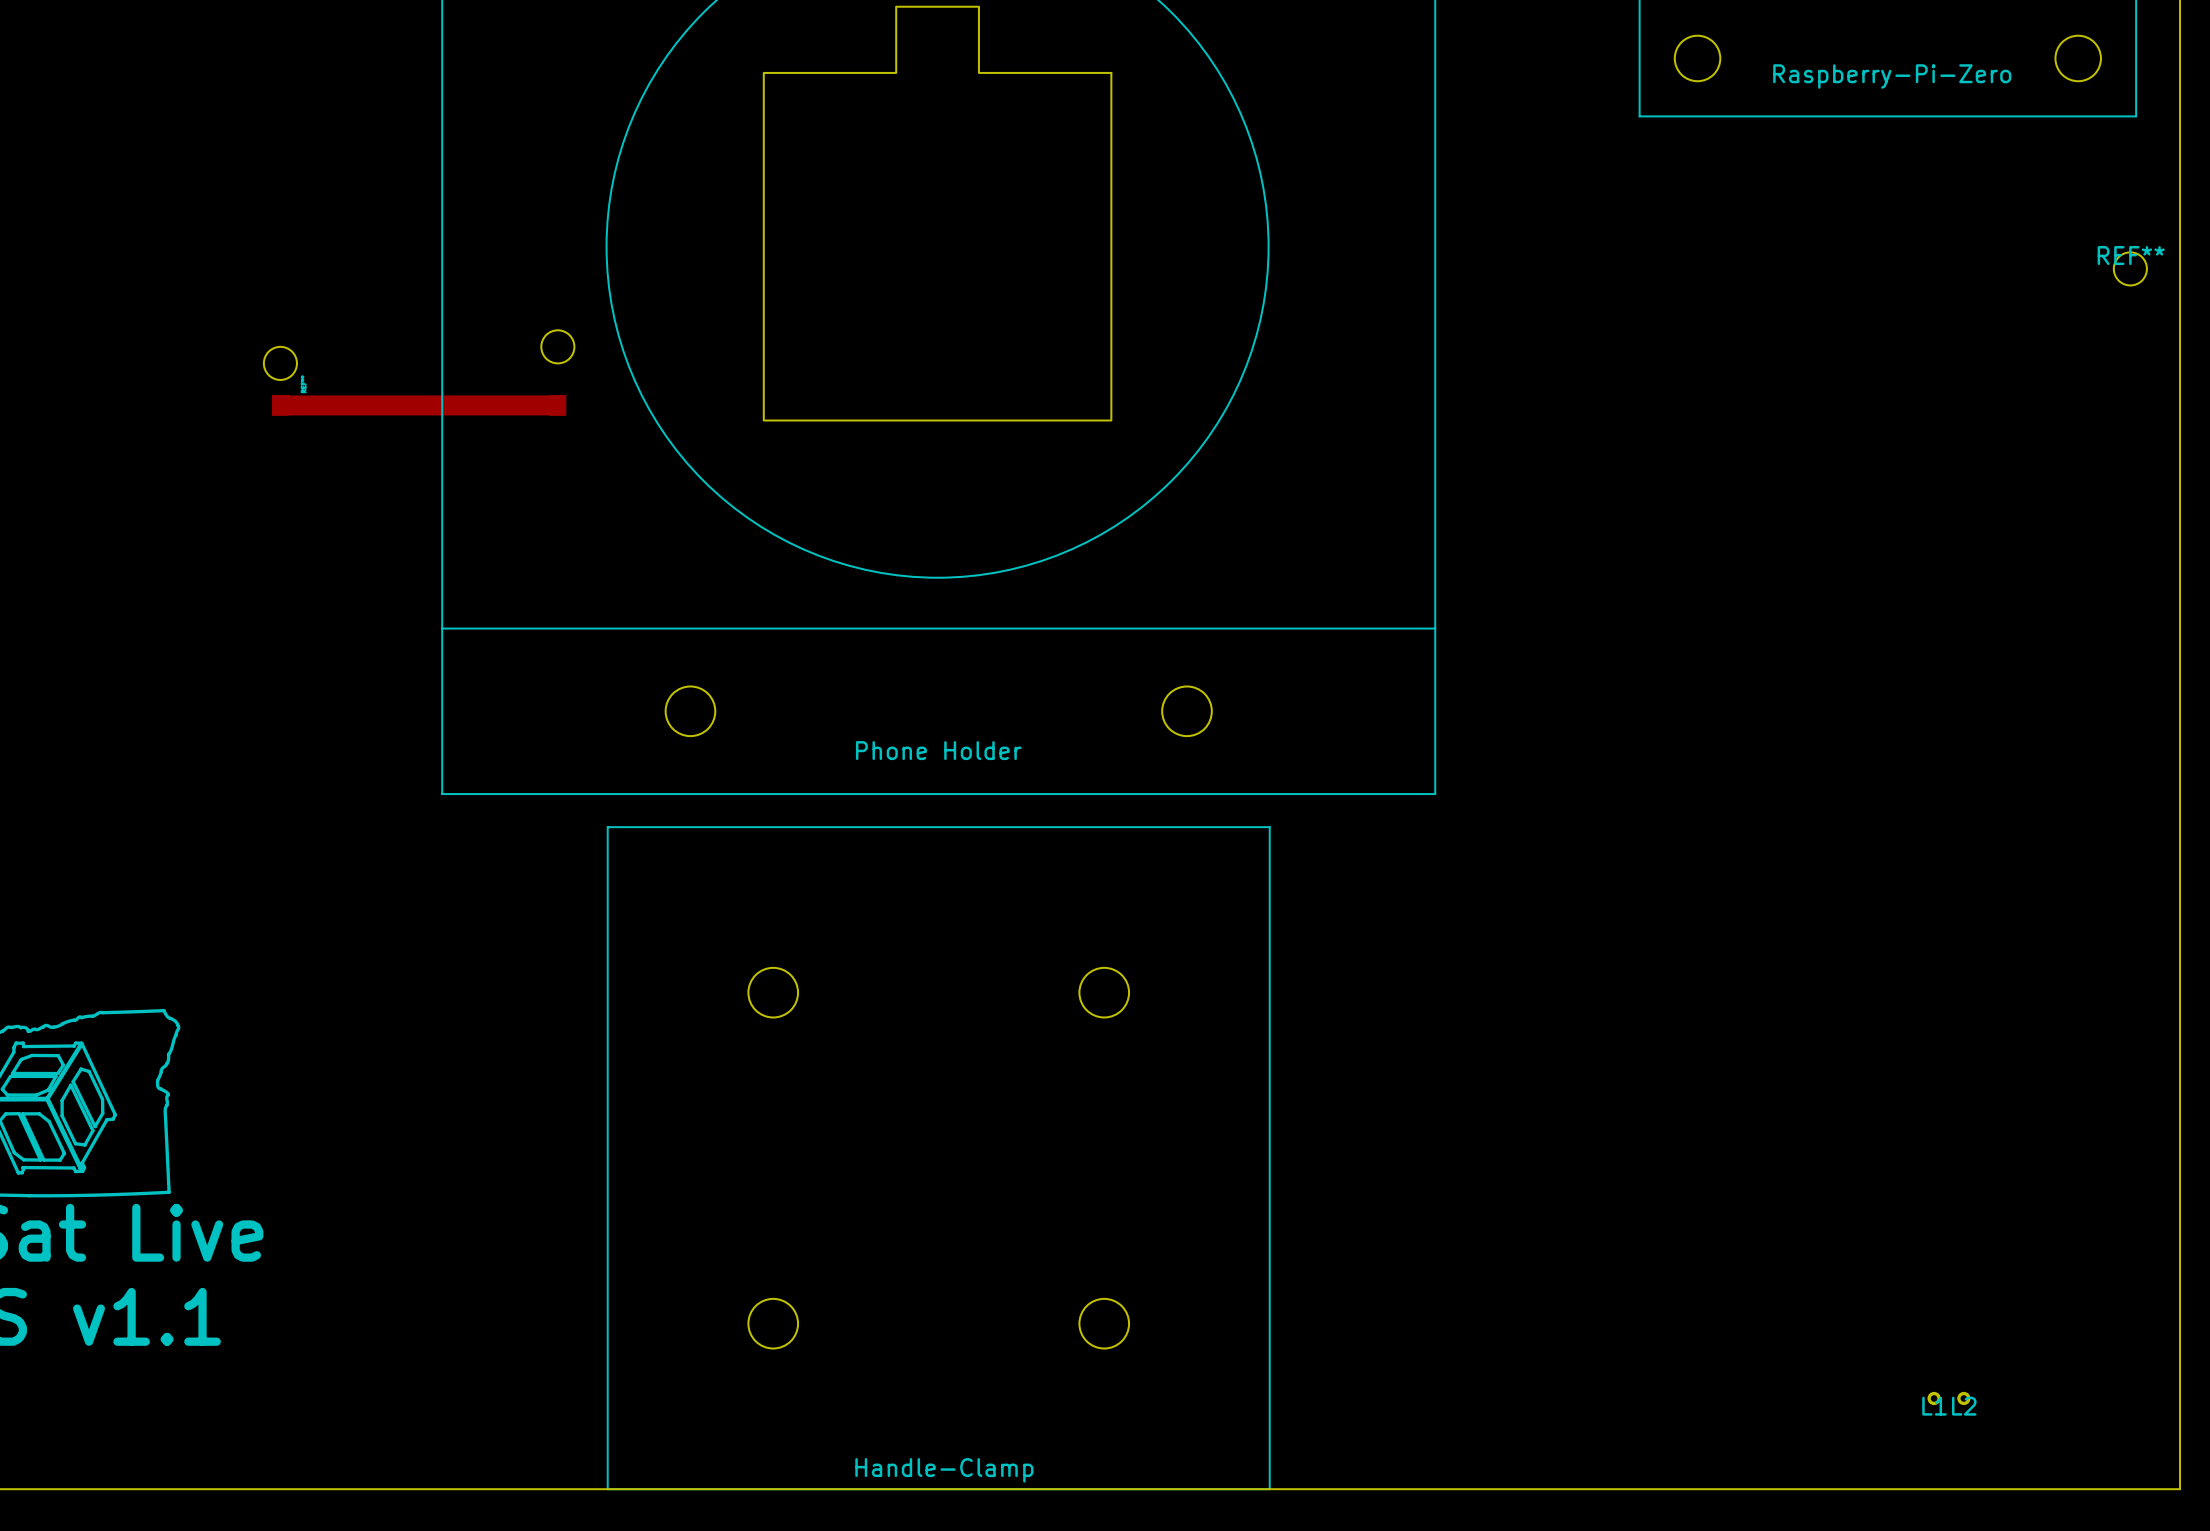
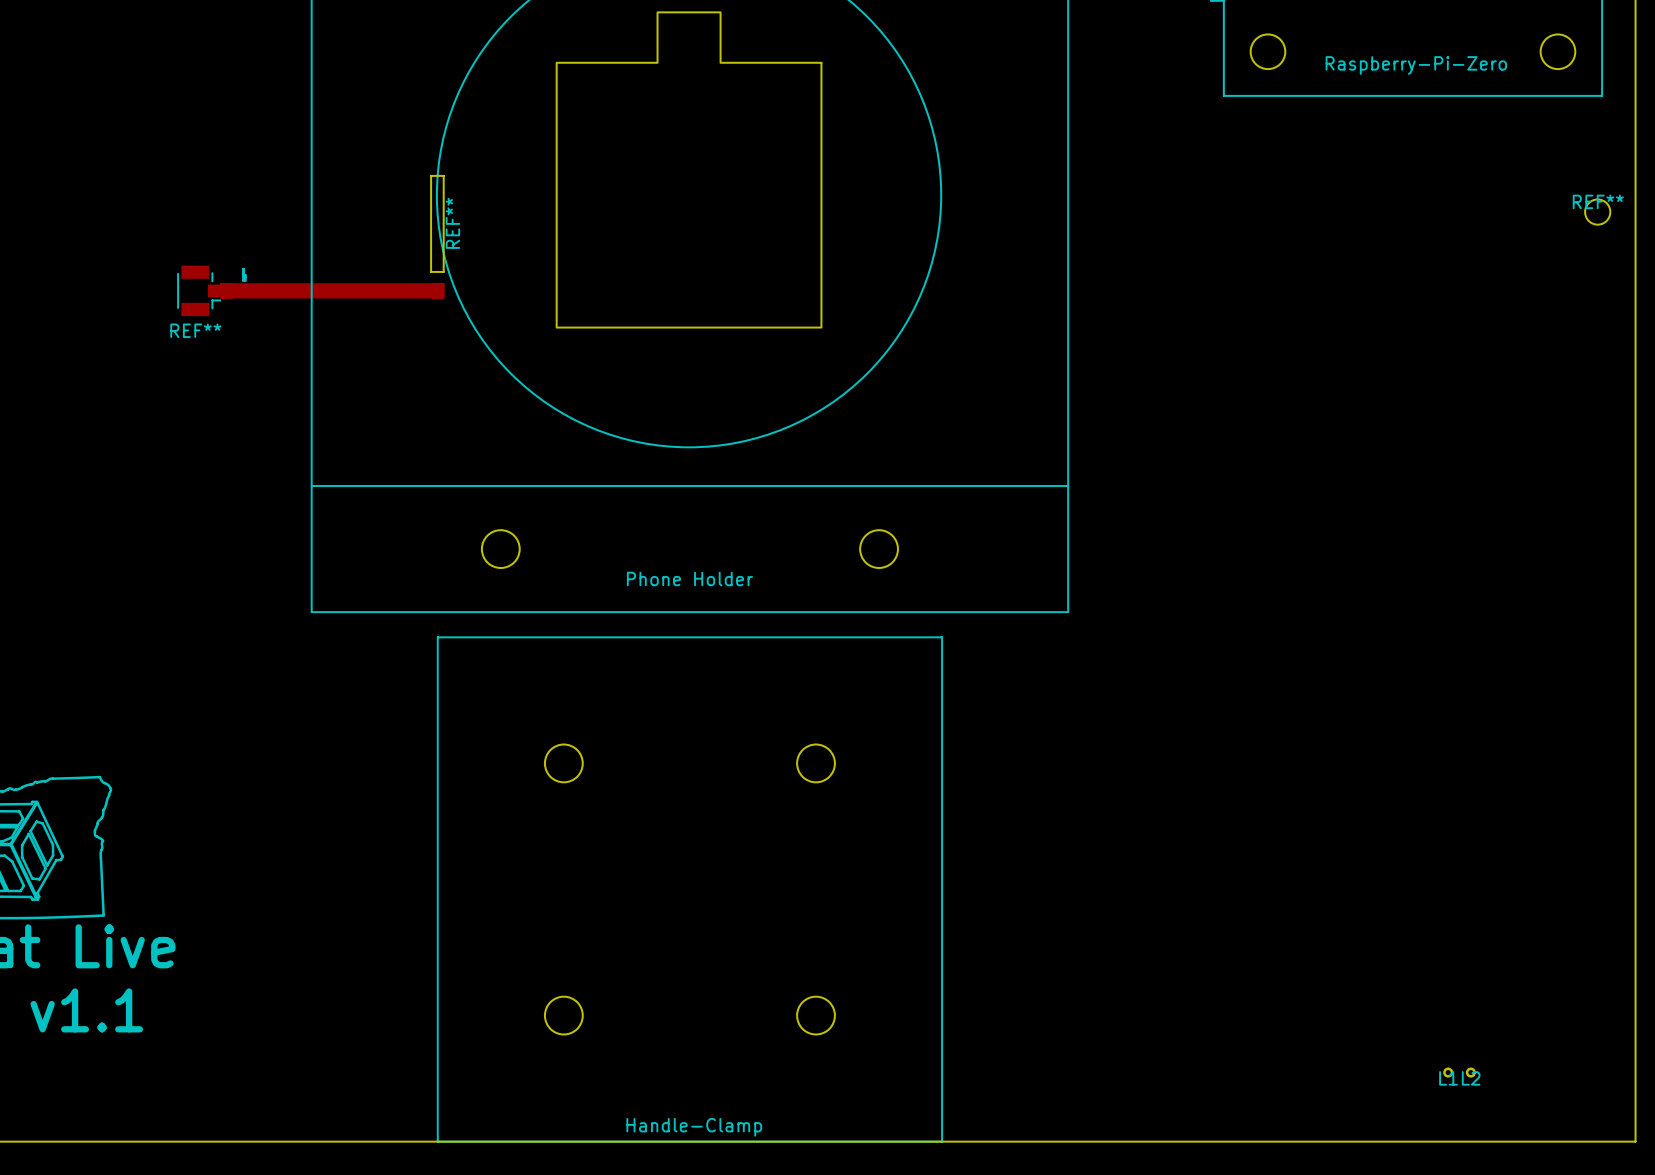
REF**: none -> (437, 223)
REF**: none -> (199, 290)
part: (419, 372) -> none
part: none -> (332, 290)

